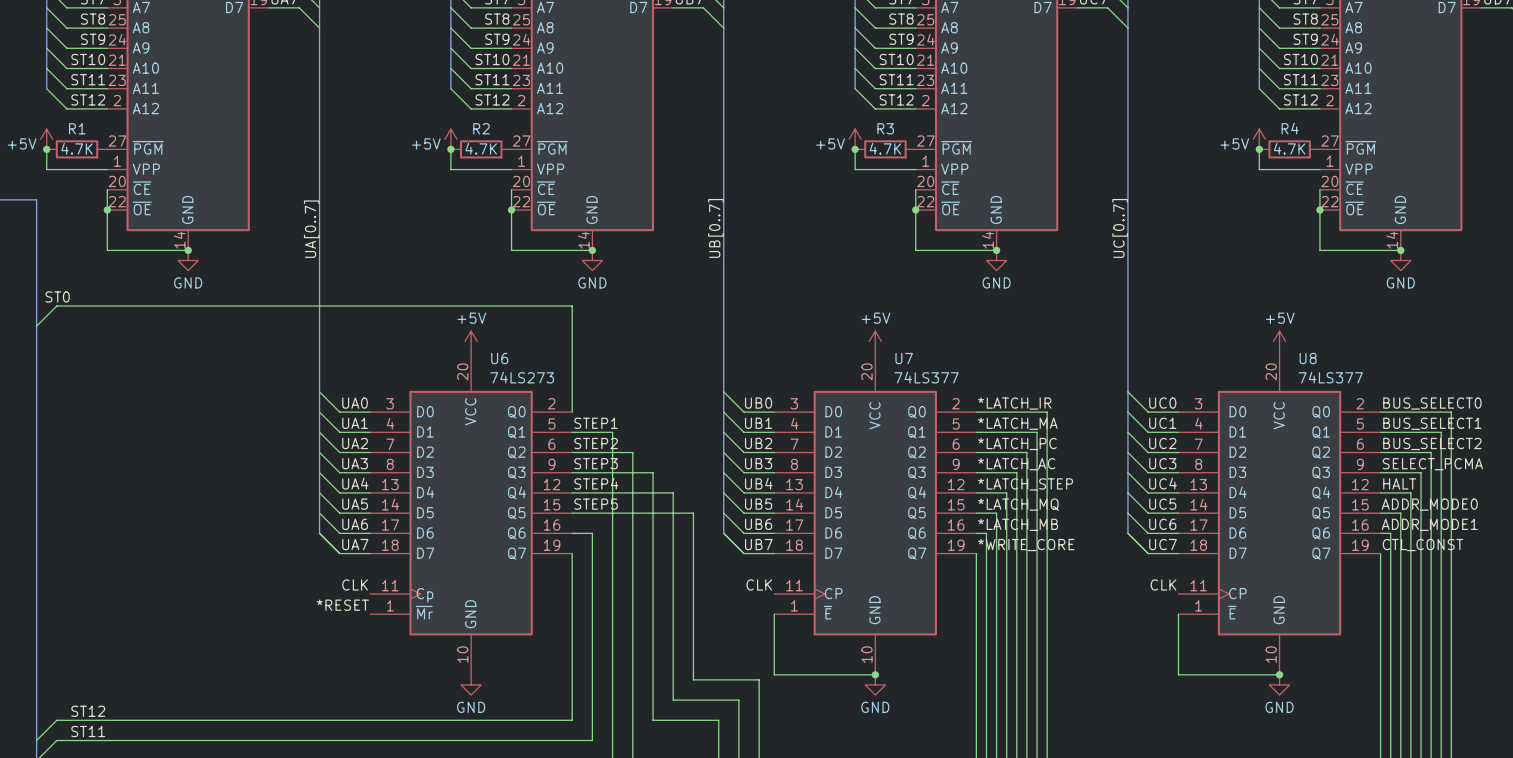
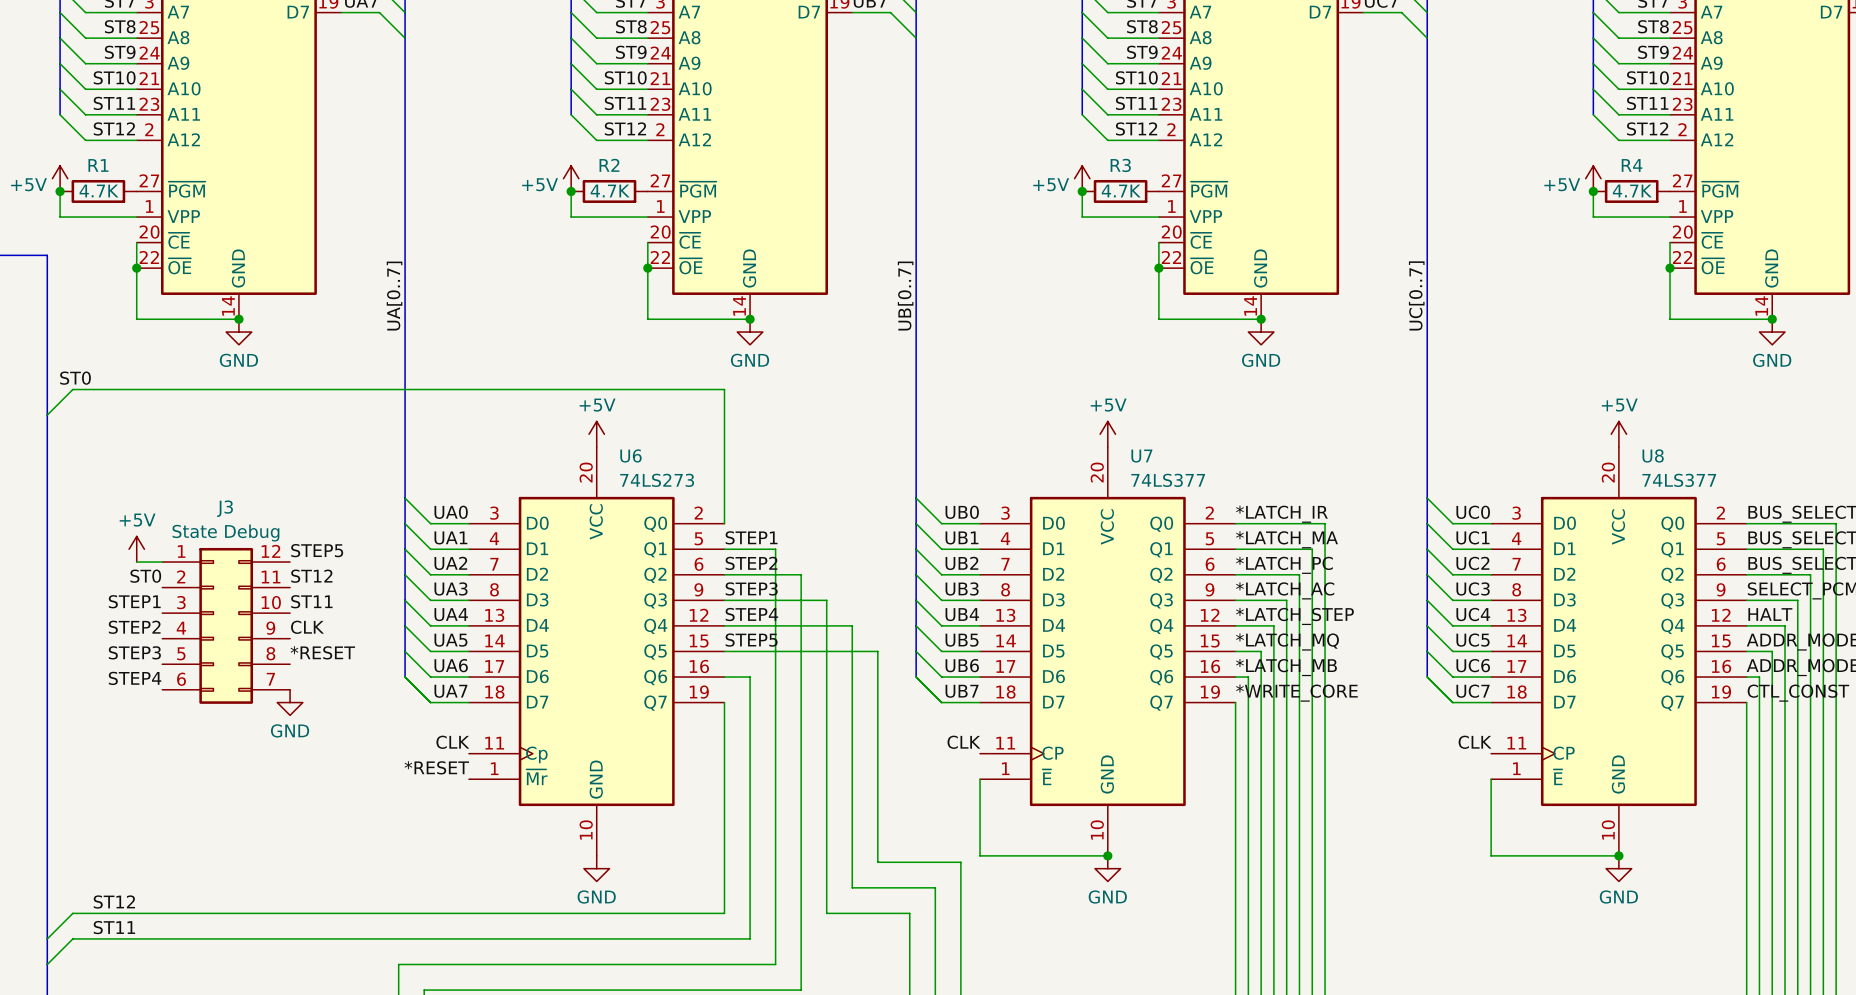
power symbol: none -> +5V (136, 549)
label: none -> STEP5 (317, 550)
wire: none -> (136, 562) (162, 562)
label: none -> ST0 (145, 576)
label: none -> ST12 (311, 576)
label: none -> STEP1 (134, 601)
label: none -> ST11 (311, 601)
J3: none -> State Debug (226, 625)
label: none -> STEP2 (134, 627)
label: none -> CLK (307, 627)
label: none -> STEP3 (134, 652)
label: none -> *RESET (322, 652)
label: none -> STEP4 (135, 678)
power symbol: none -> GND (290, 702)

